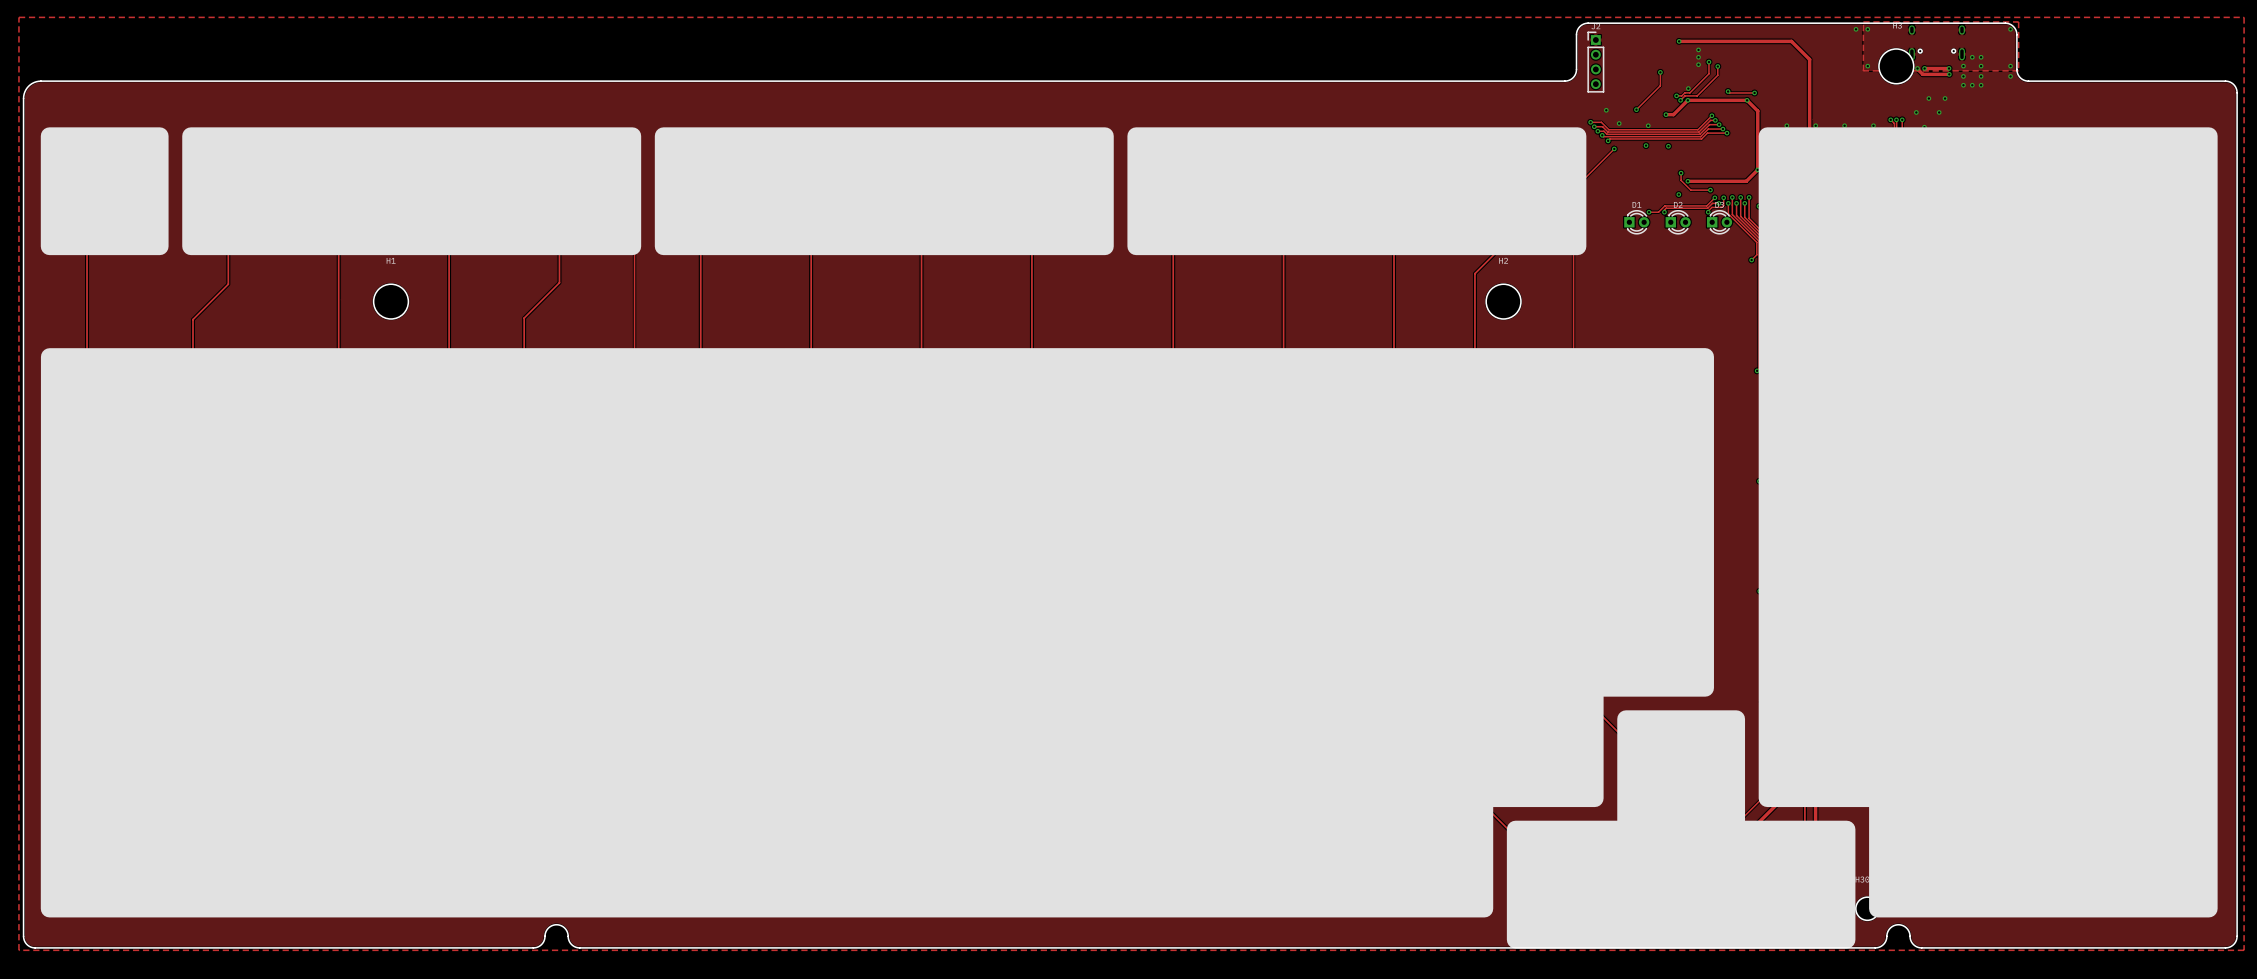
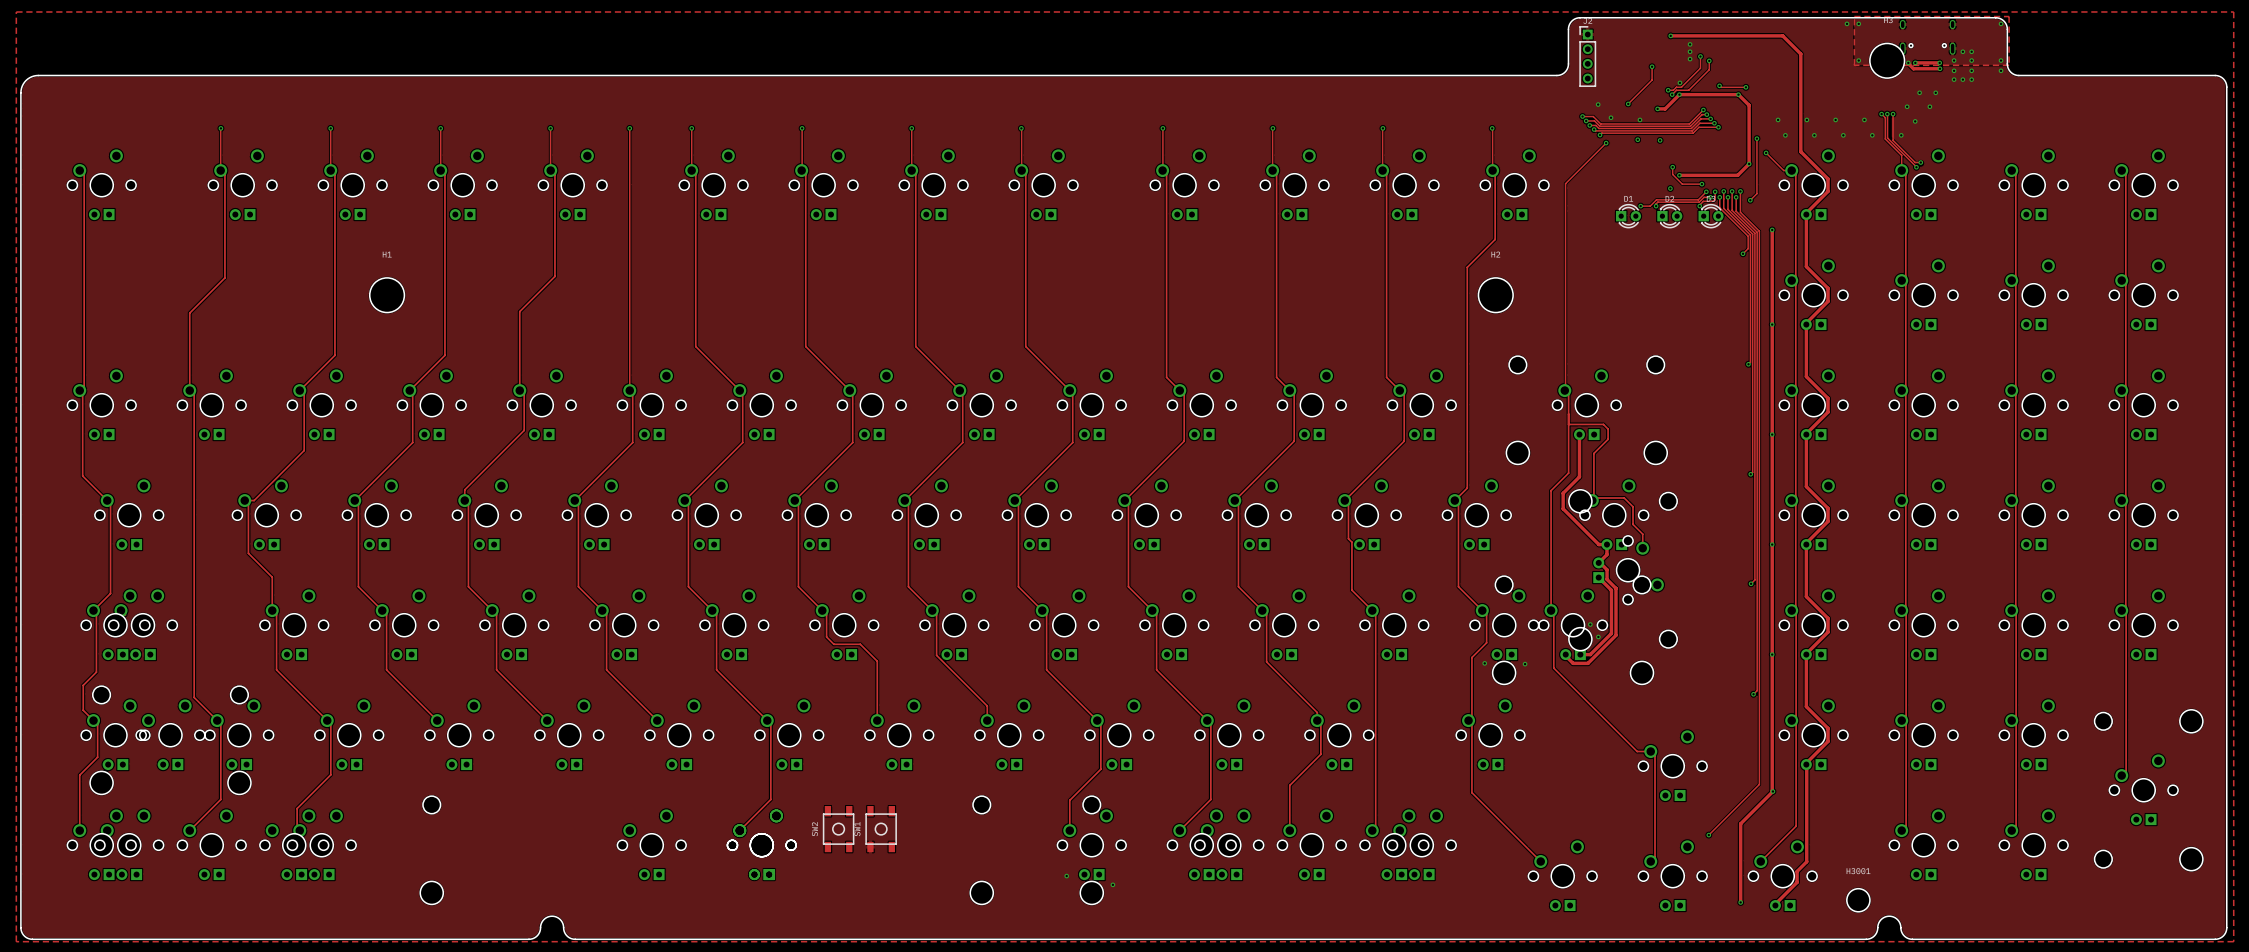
drawing: [40, 127, 169, 256] -> none
drawing: [40, 127, 2218, 949] -> none
drawing: [182, 127, 642, 256] -> none
drawing: [654, 127, 1114, 256] -> none
drawing: [1127, 127, 1587, 256] -> none

